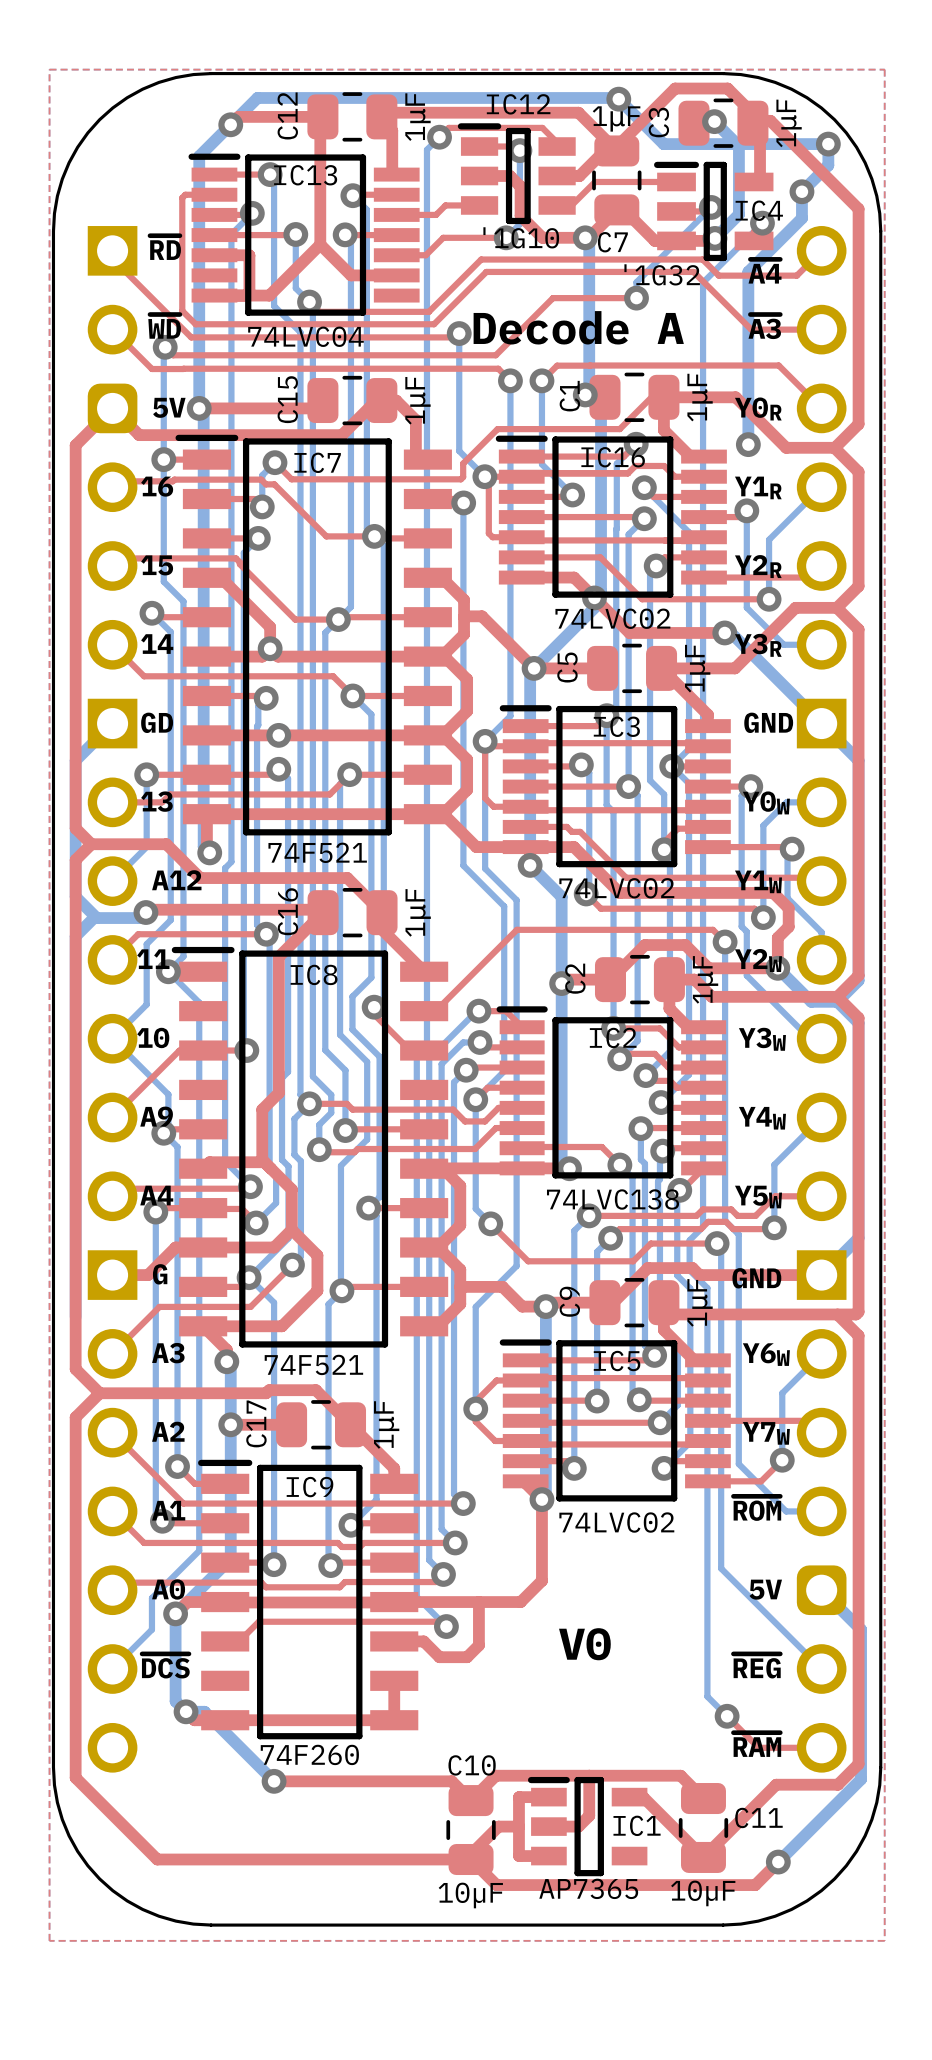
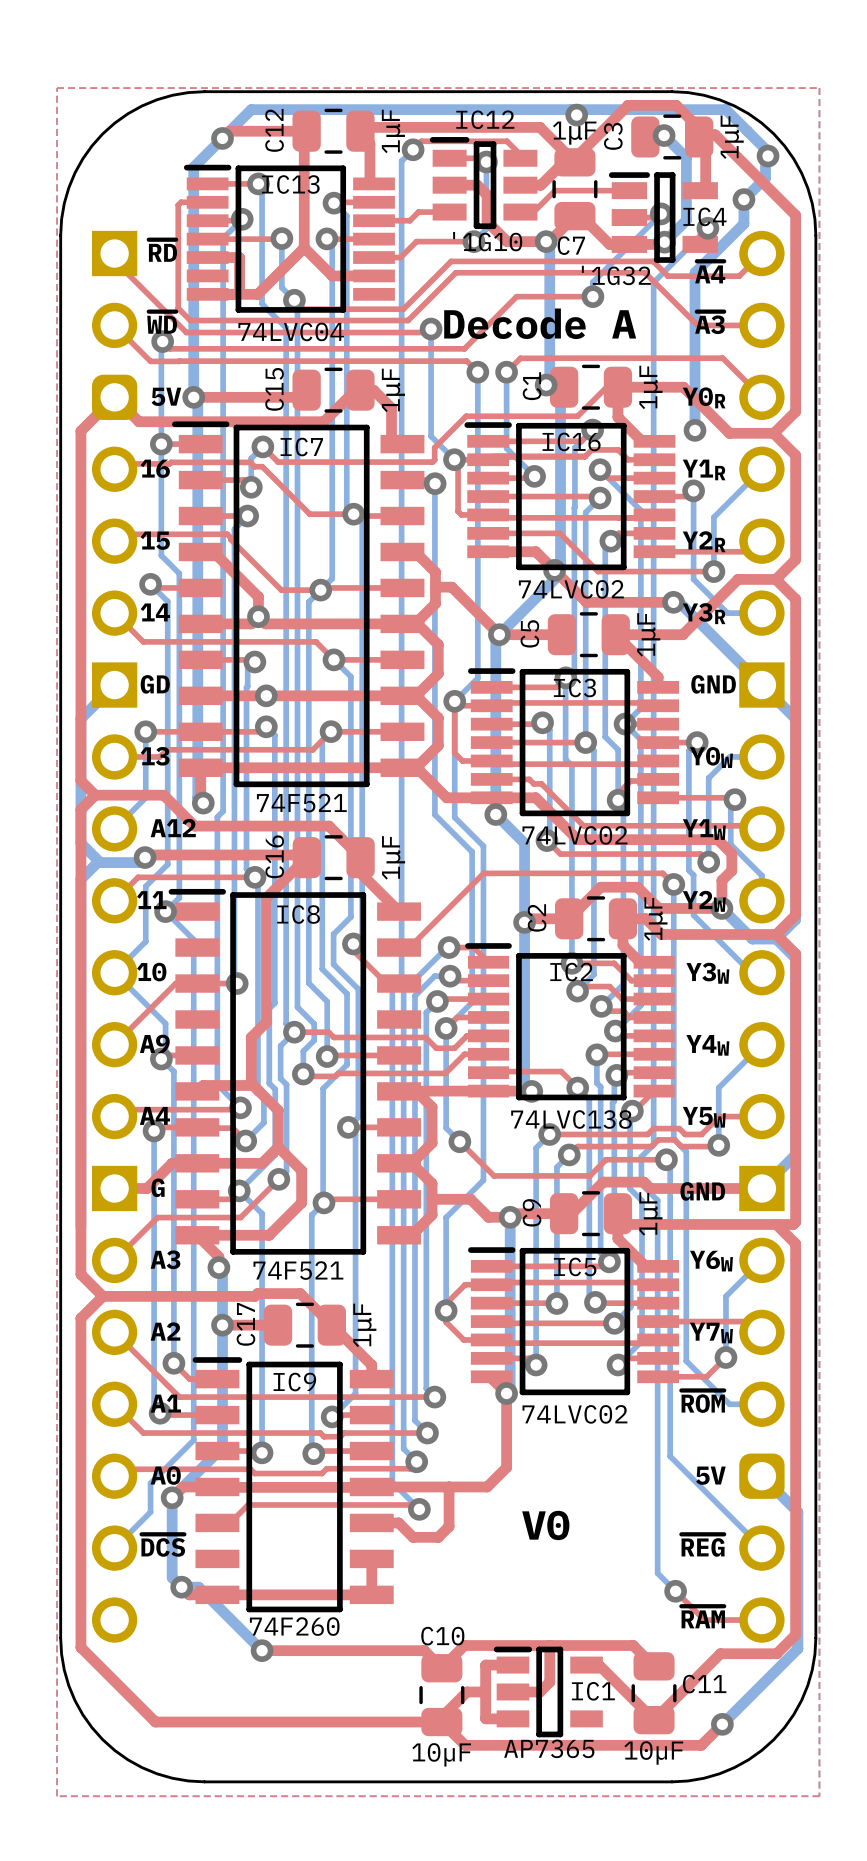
bottom track: (257, 97) (617, 97) (663, 144) (828, 144) (828, 165) (825, 168) -> (246, 113) (251, 109) (725, 109) (765, 149) (765, 177)

